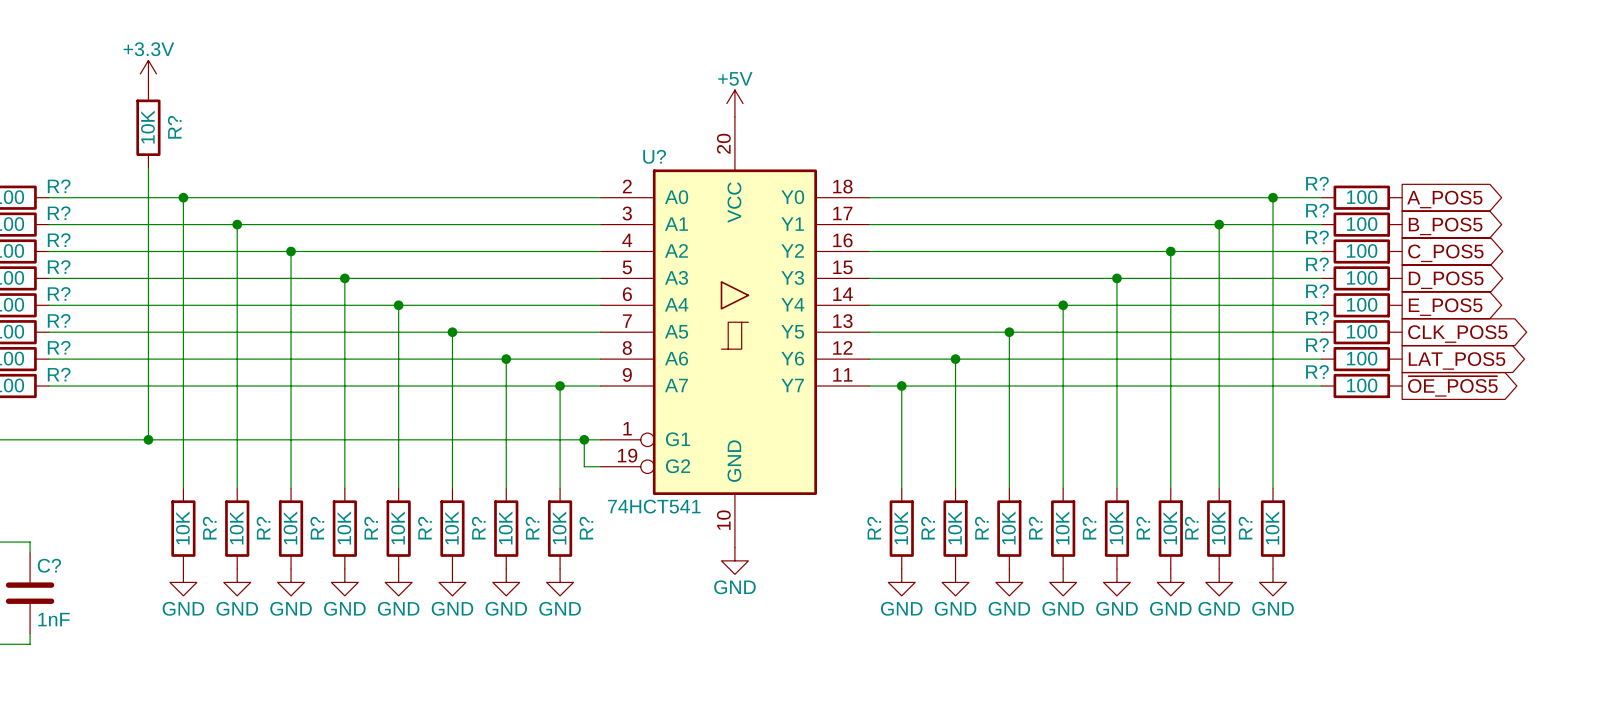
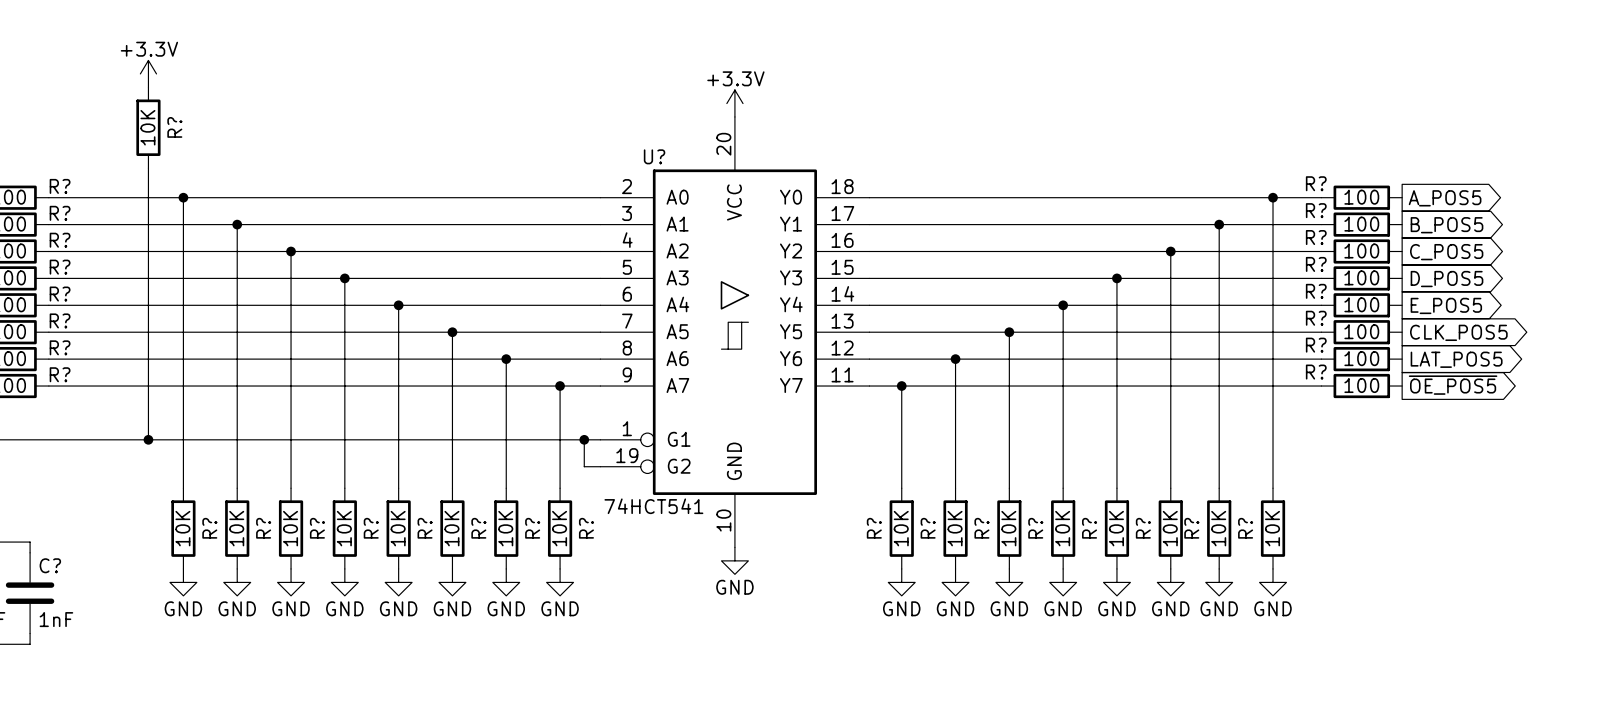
power symbol: +5V (734, 103) -> +3.3V (734, 103)

